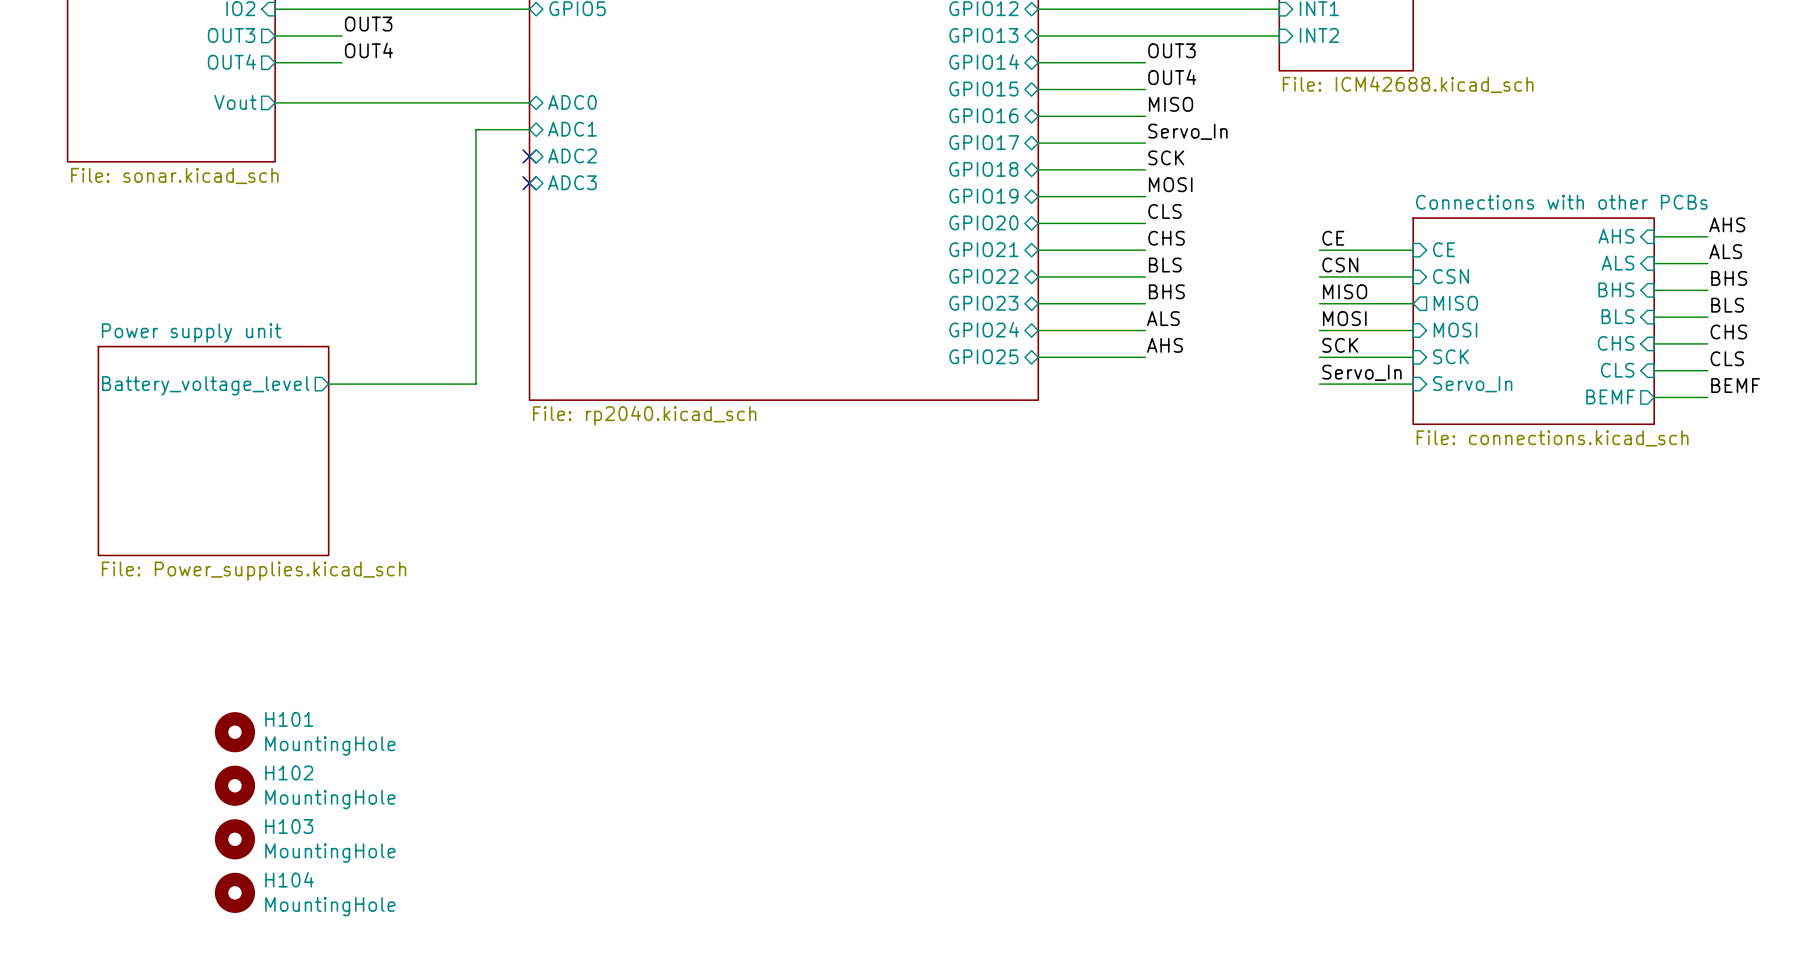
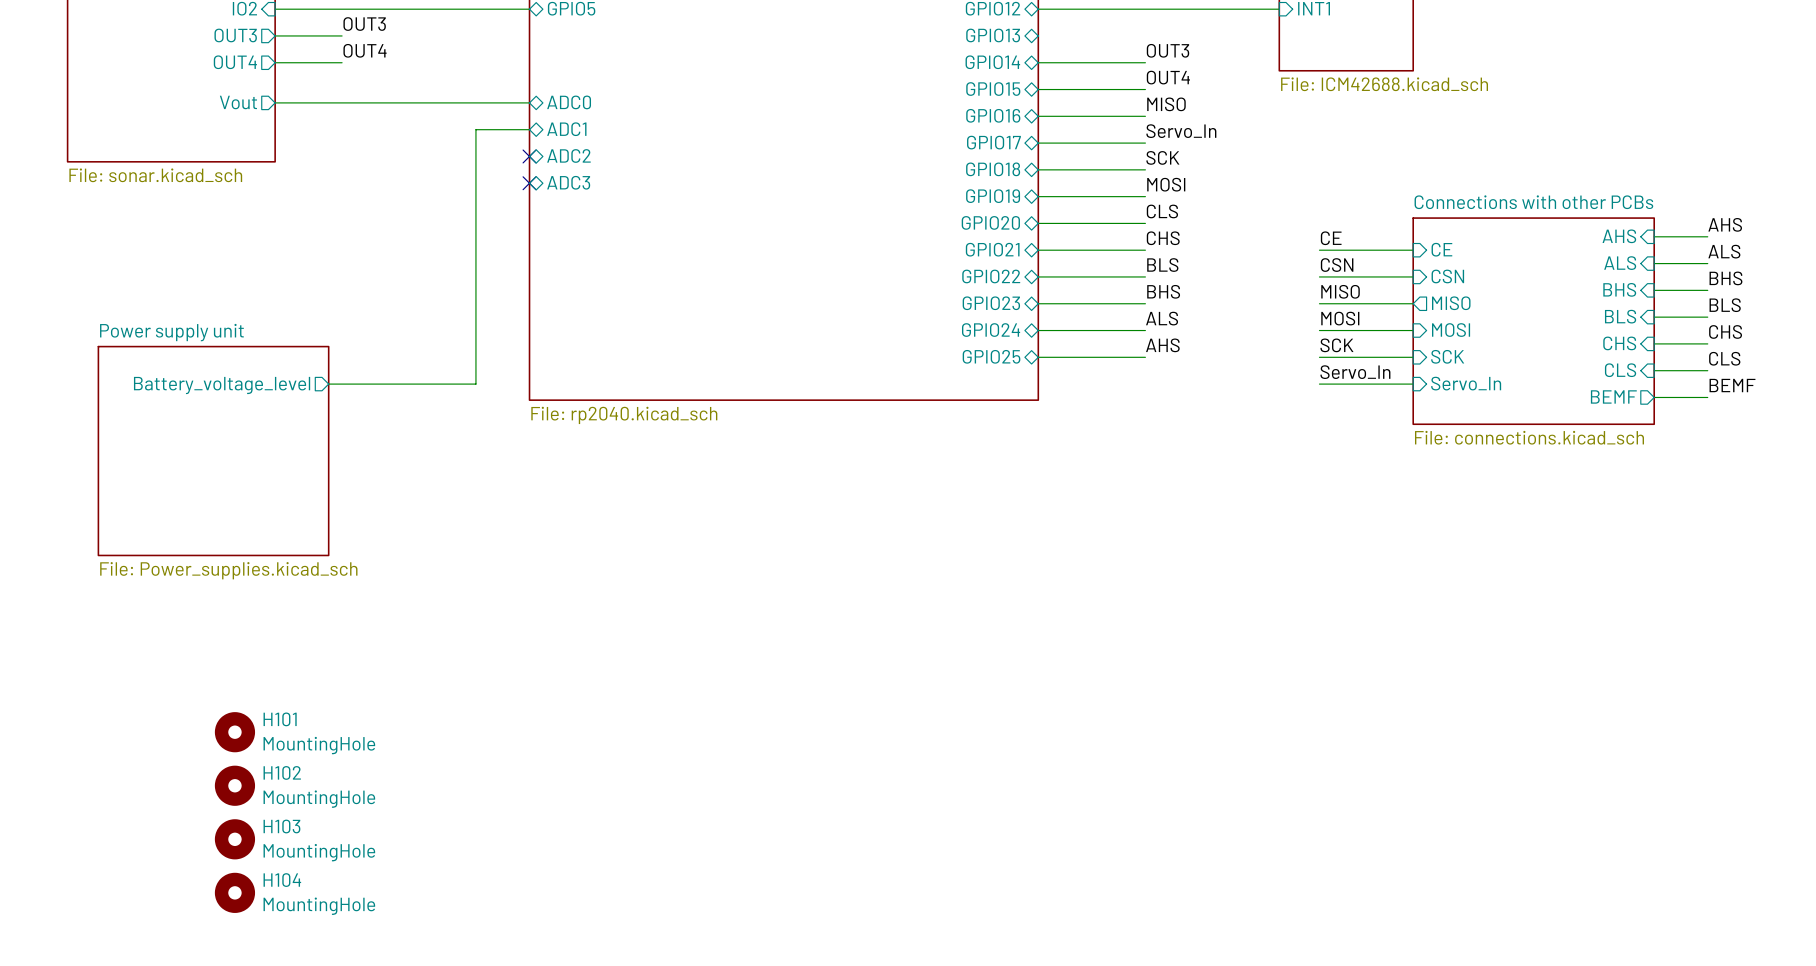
wire: (1038, 35) (1279, 35) -> none
sheet pin: INT2 (1319, 35) -> none

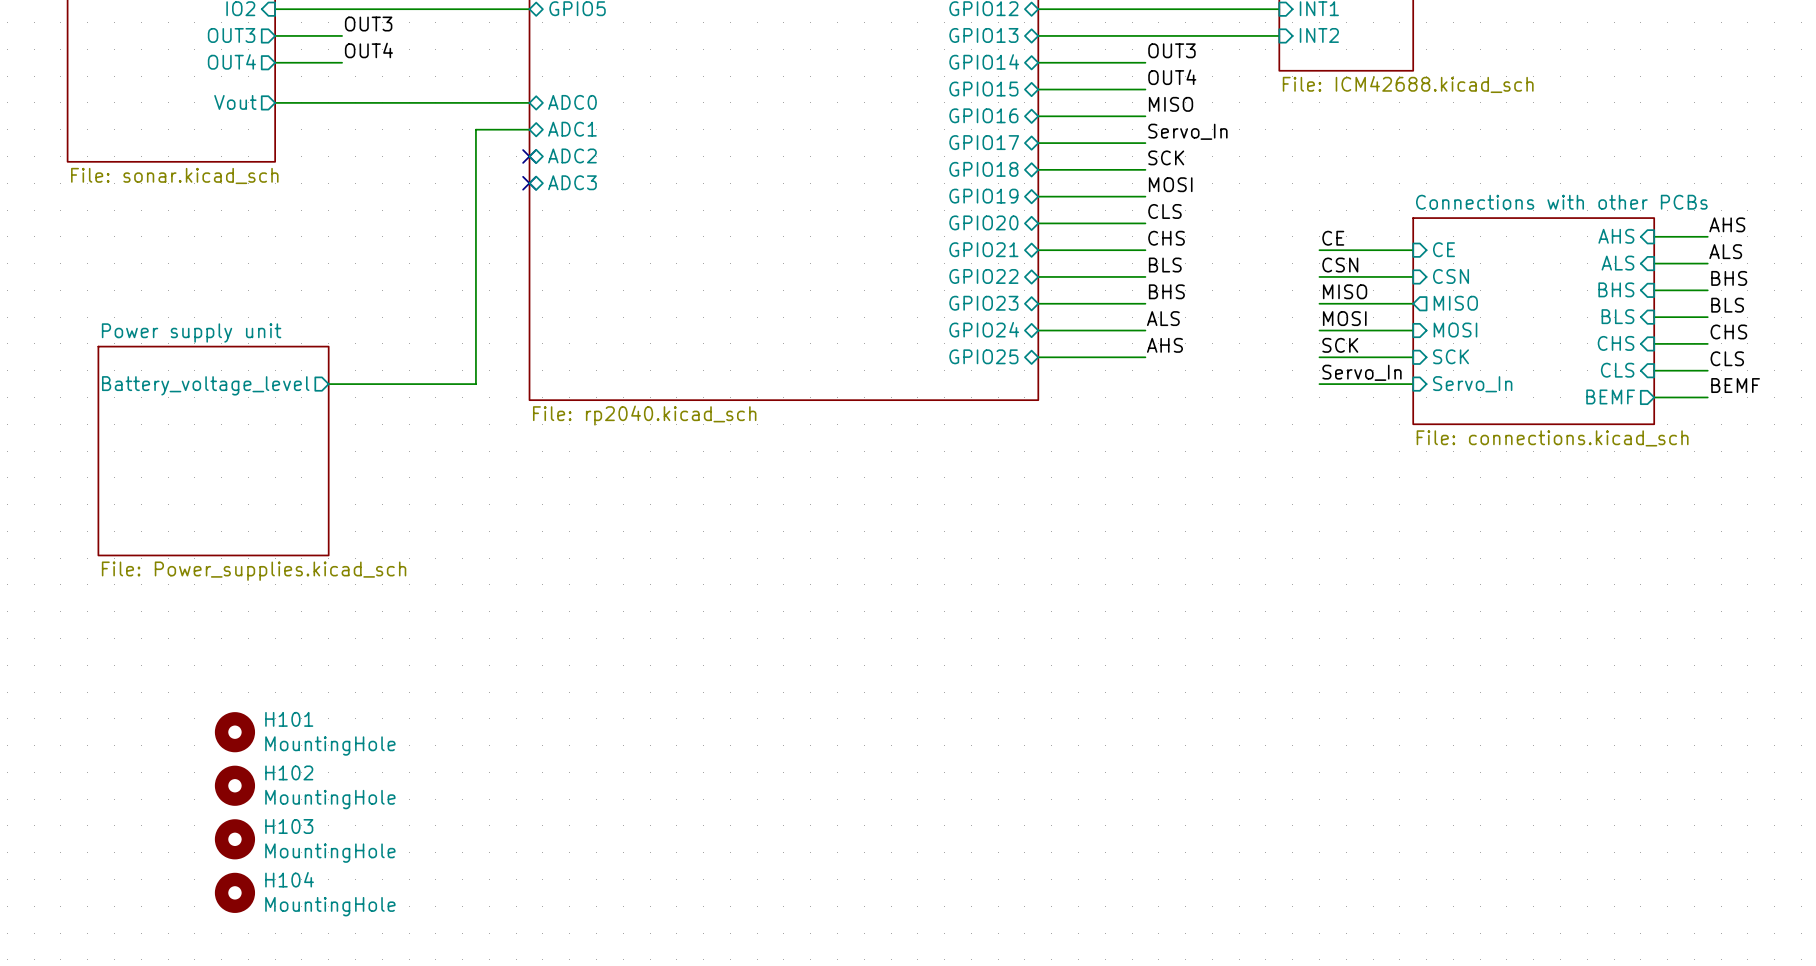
wire: none -> (1038, 35) (1279, 35)
sheet pin: none -> INT2 (1319, 35)

